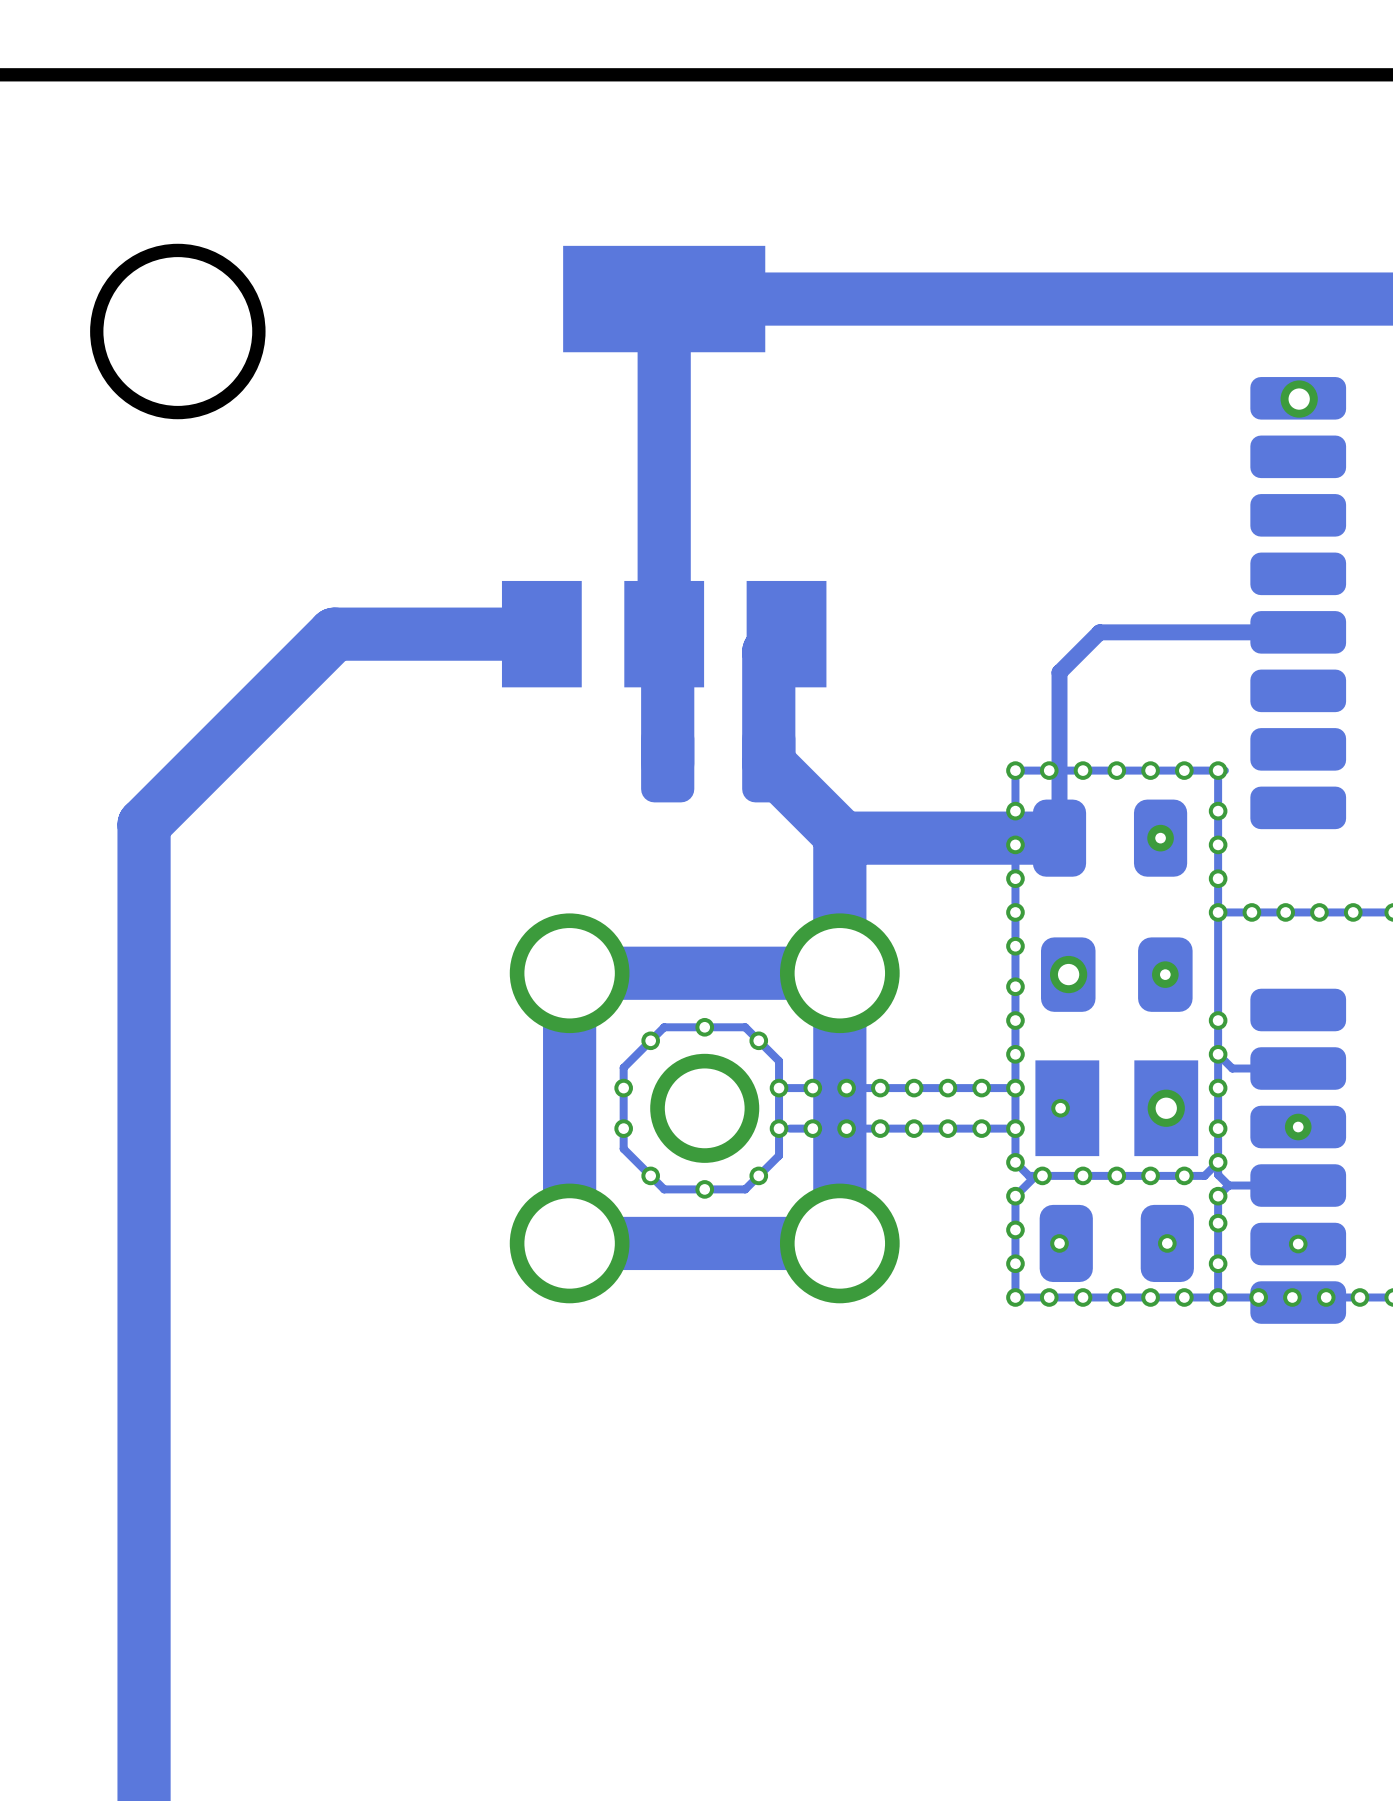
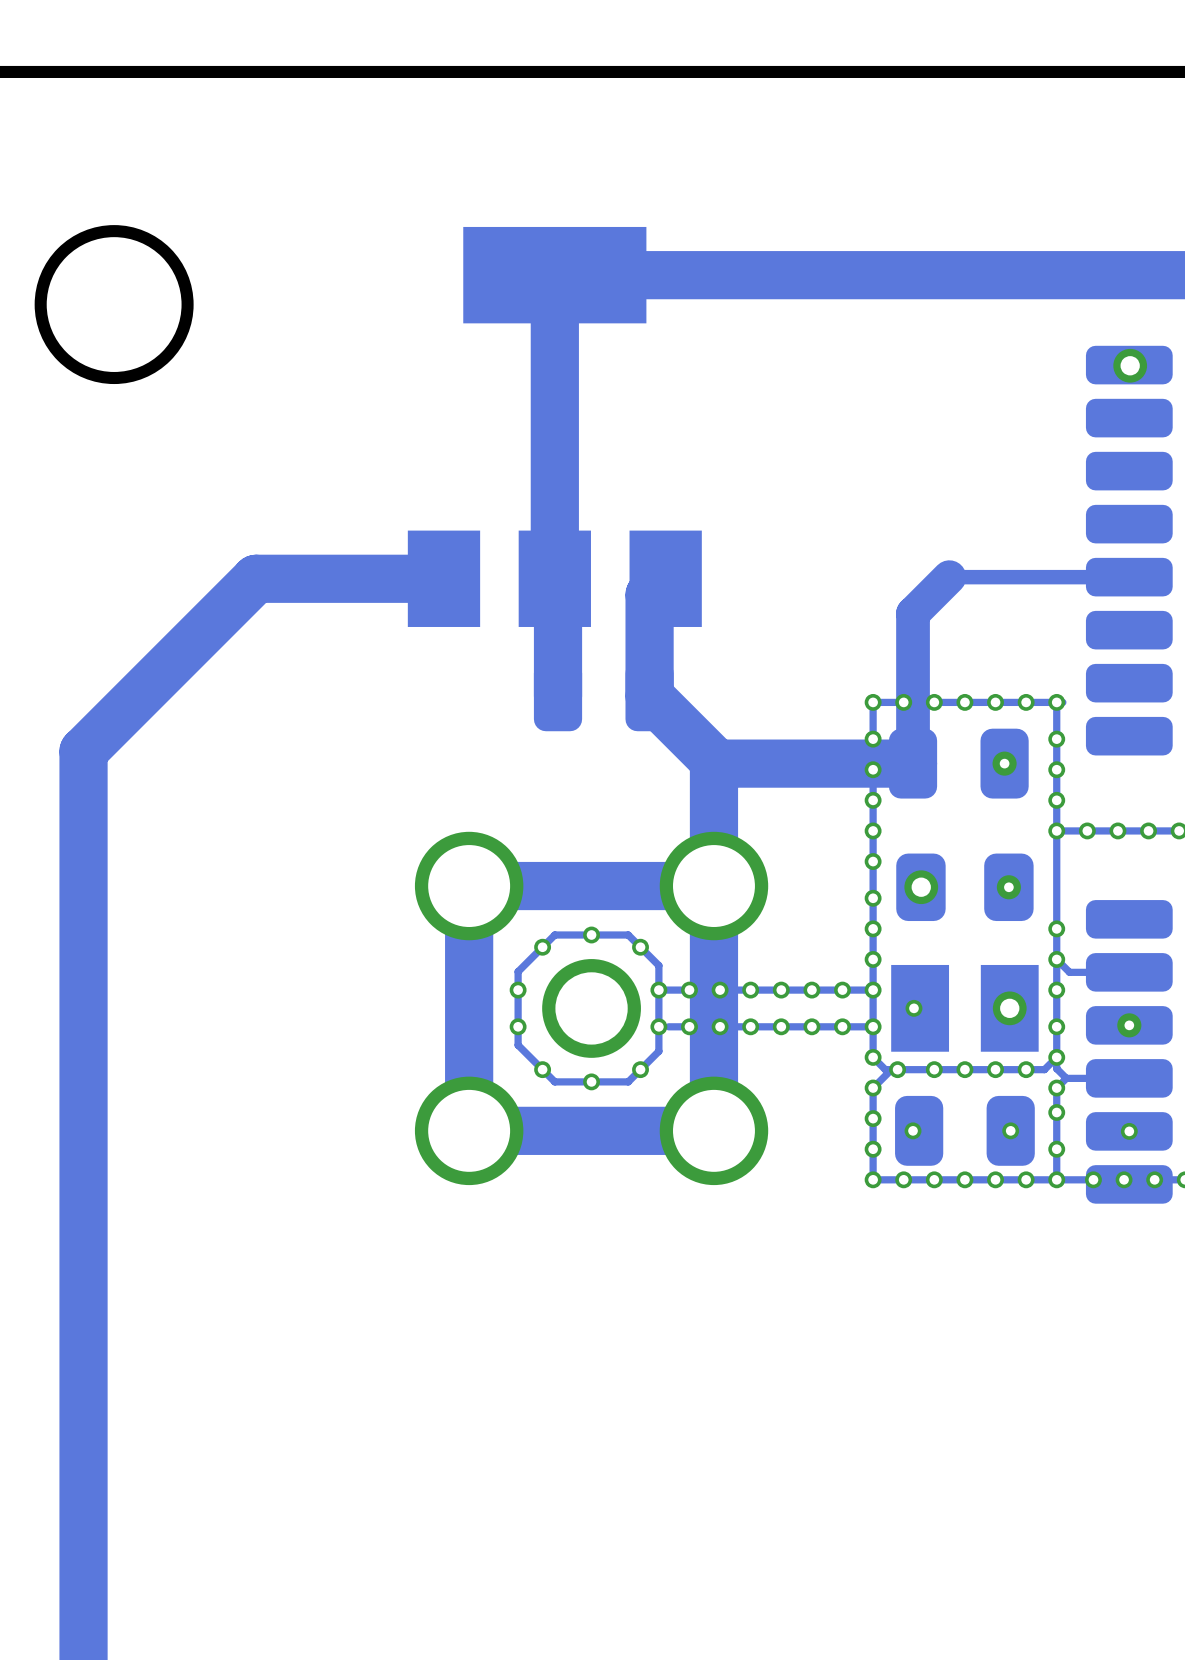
bottom track width: thin (1099, 632) (1059, 672) (1059, 838) -> thick (949, 577) (913, 613) (913, 763)

